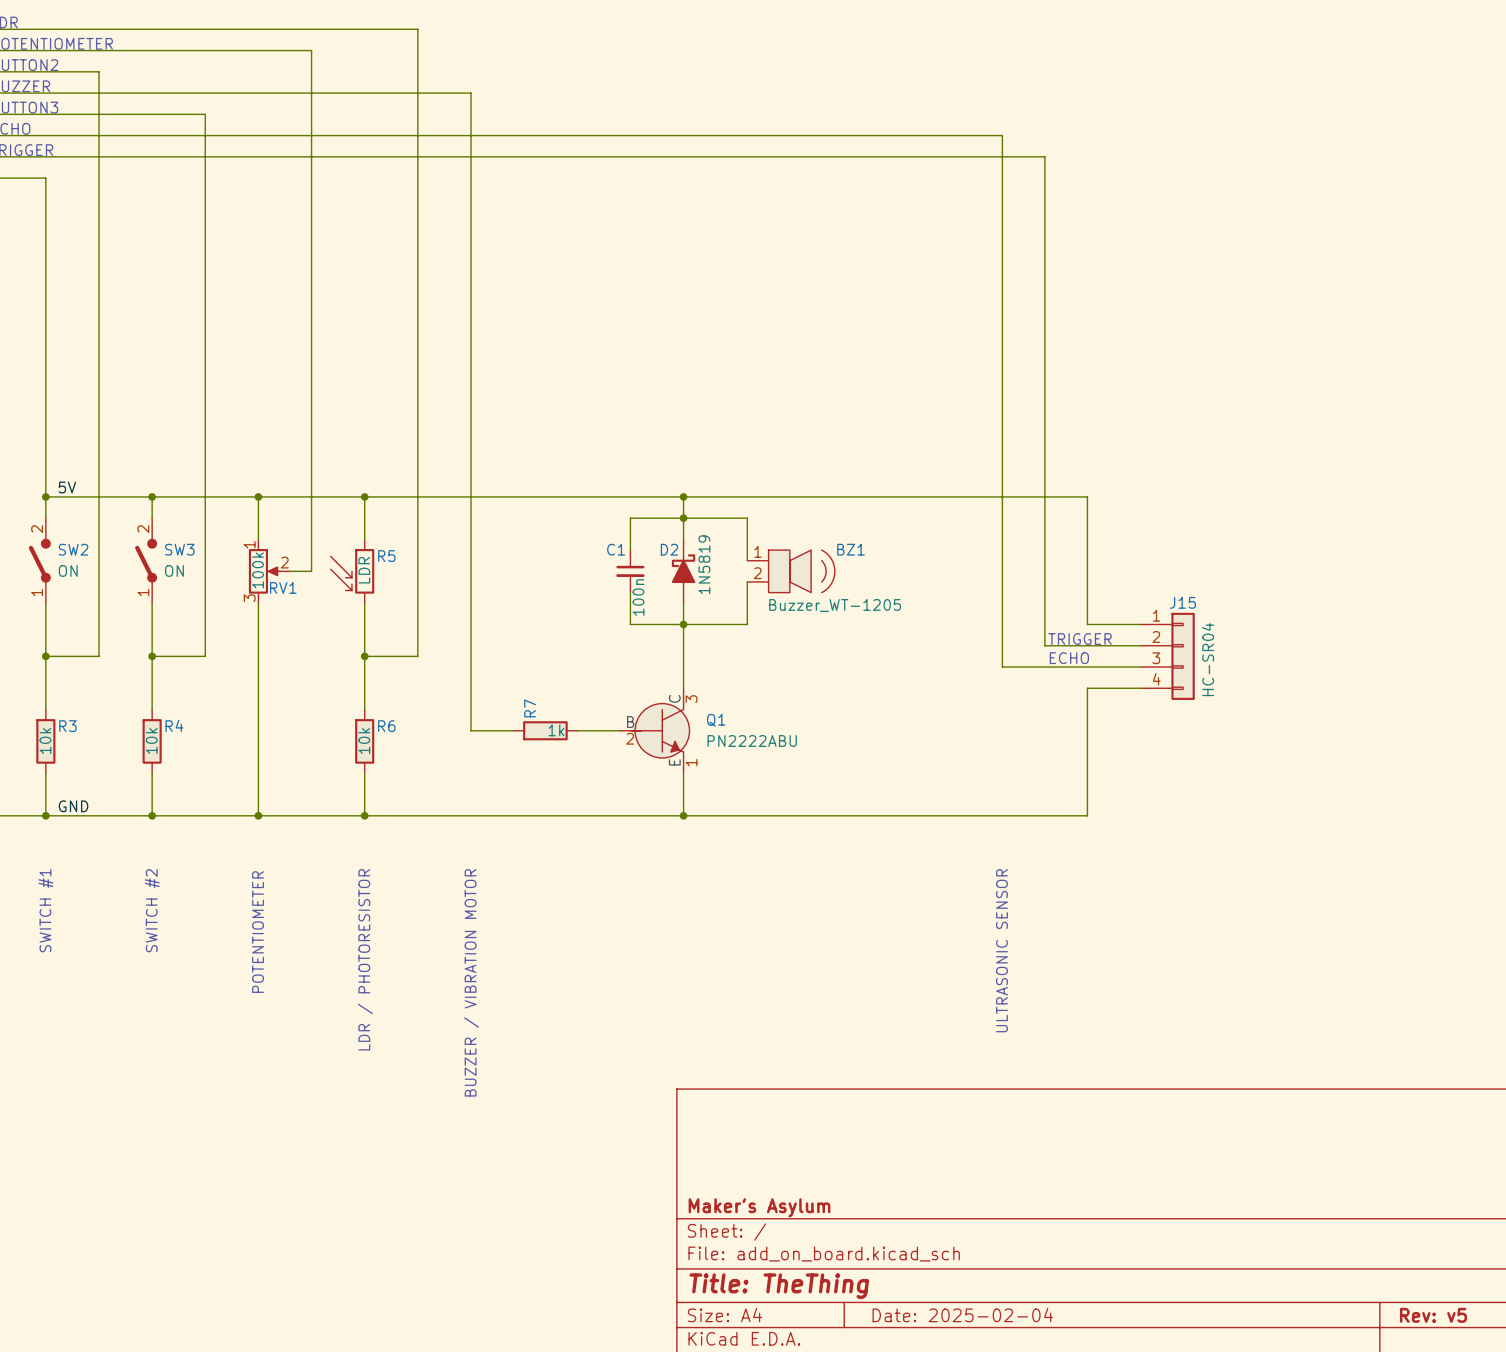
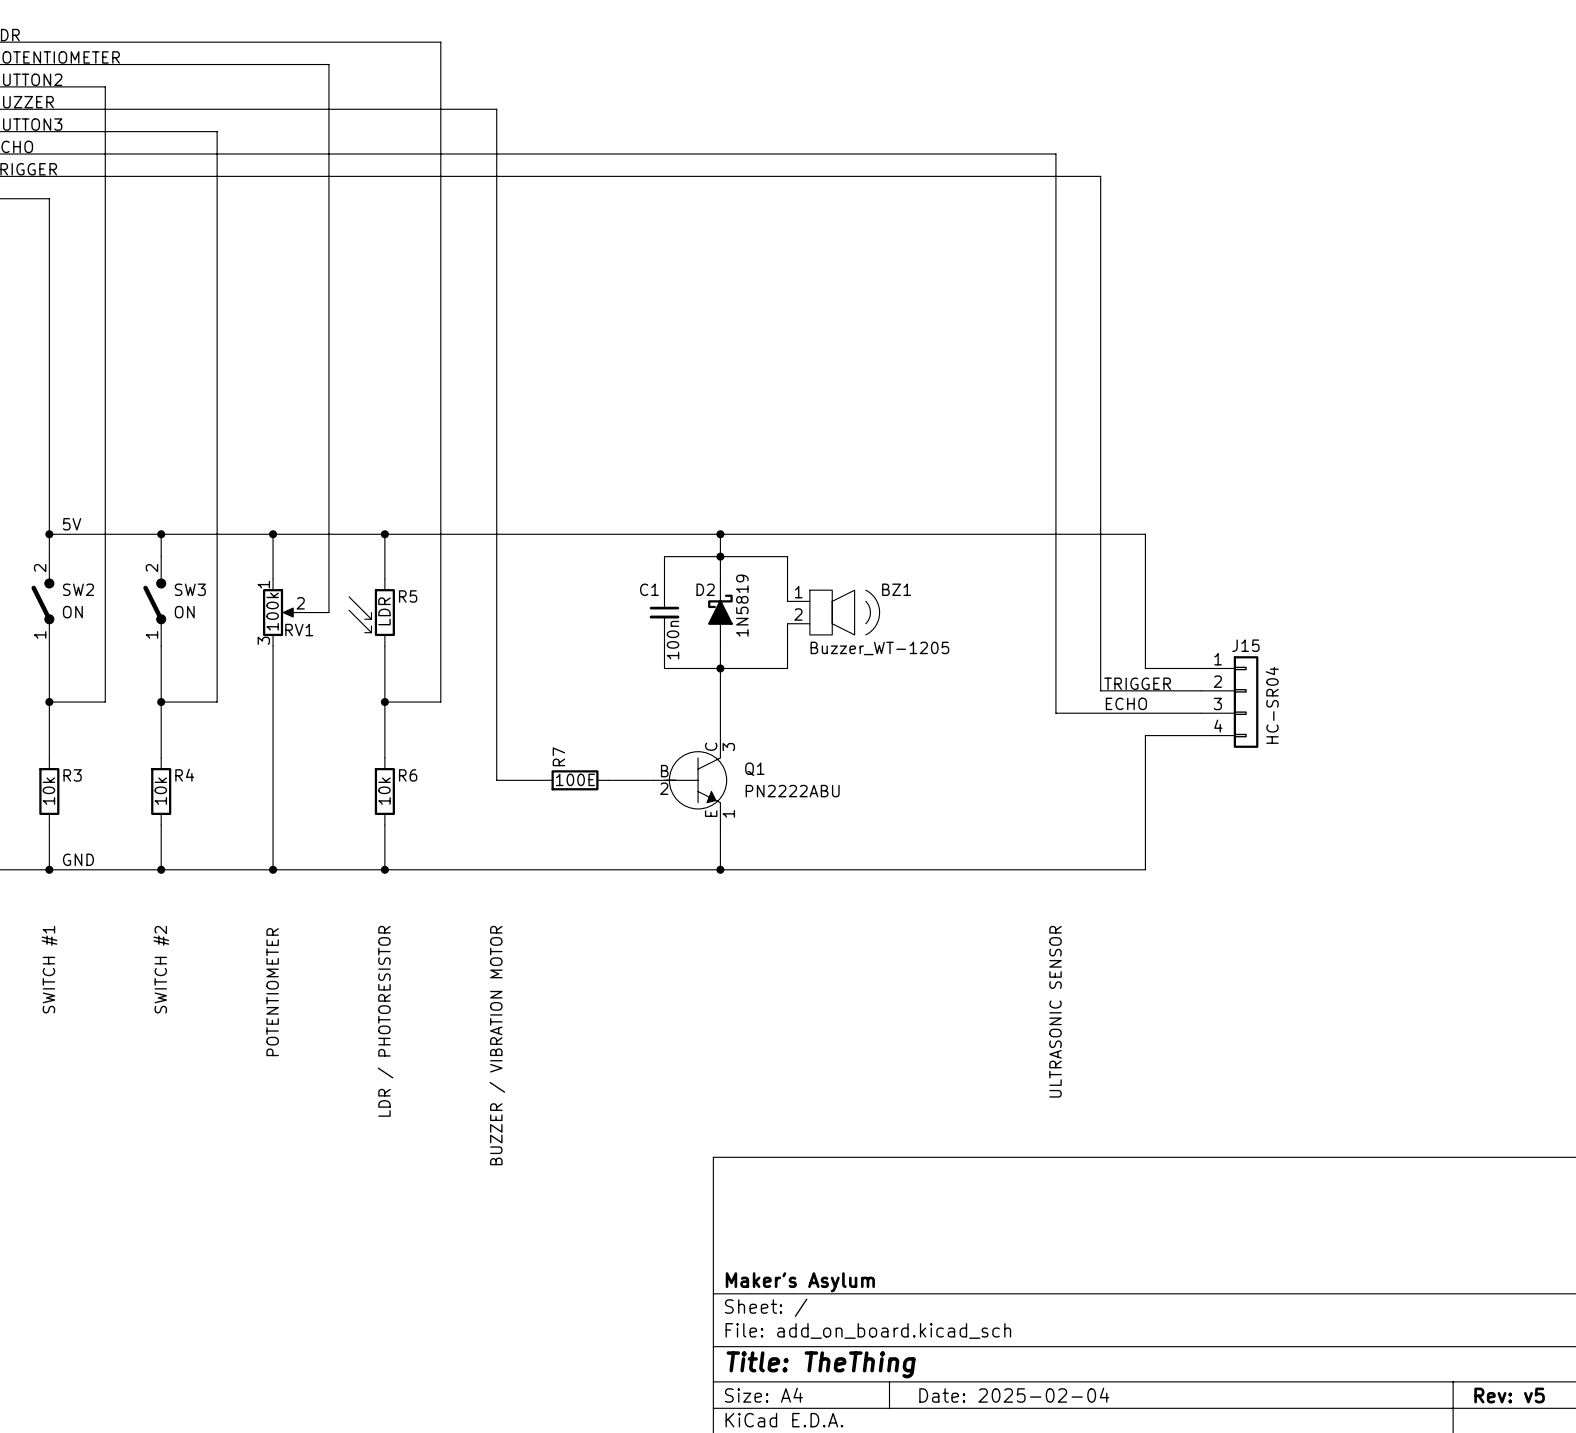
R7 value: 1k (556, 730) -> 100E (575, 779)

